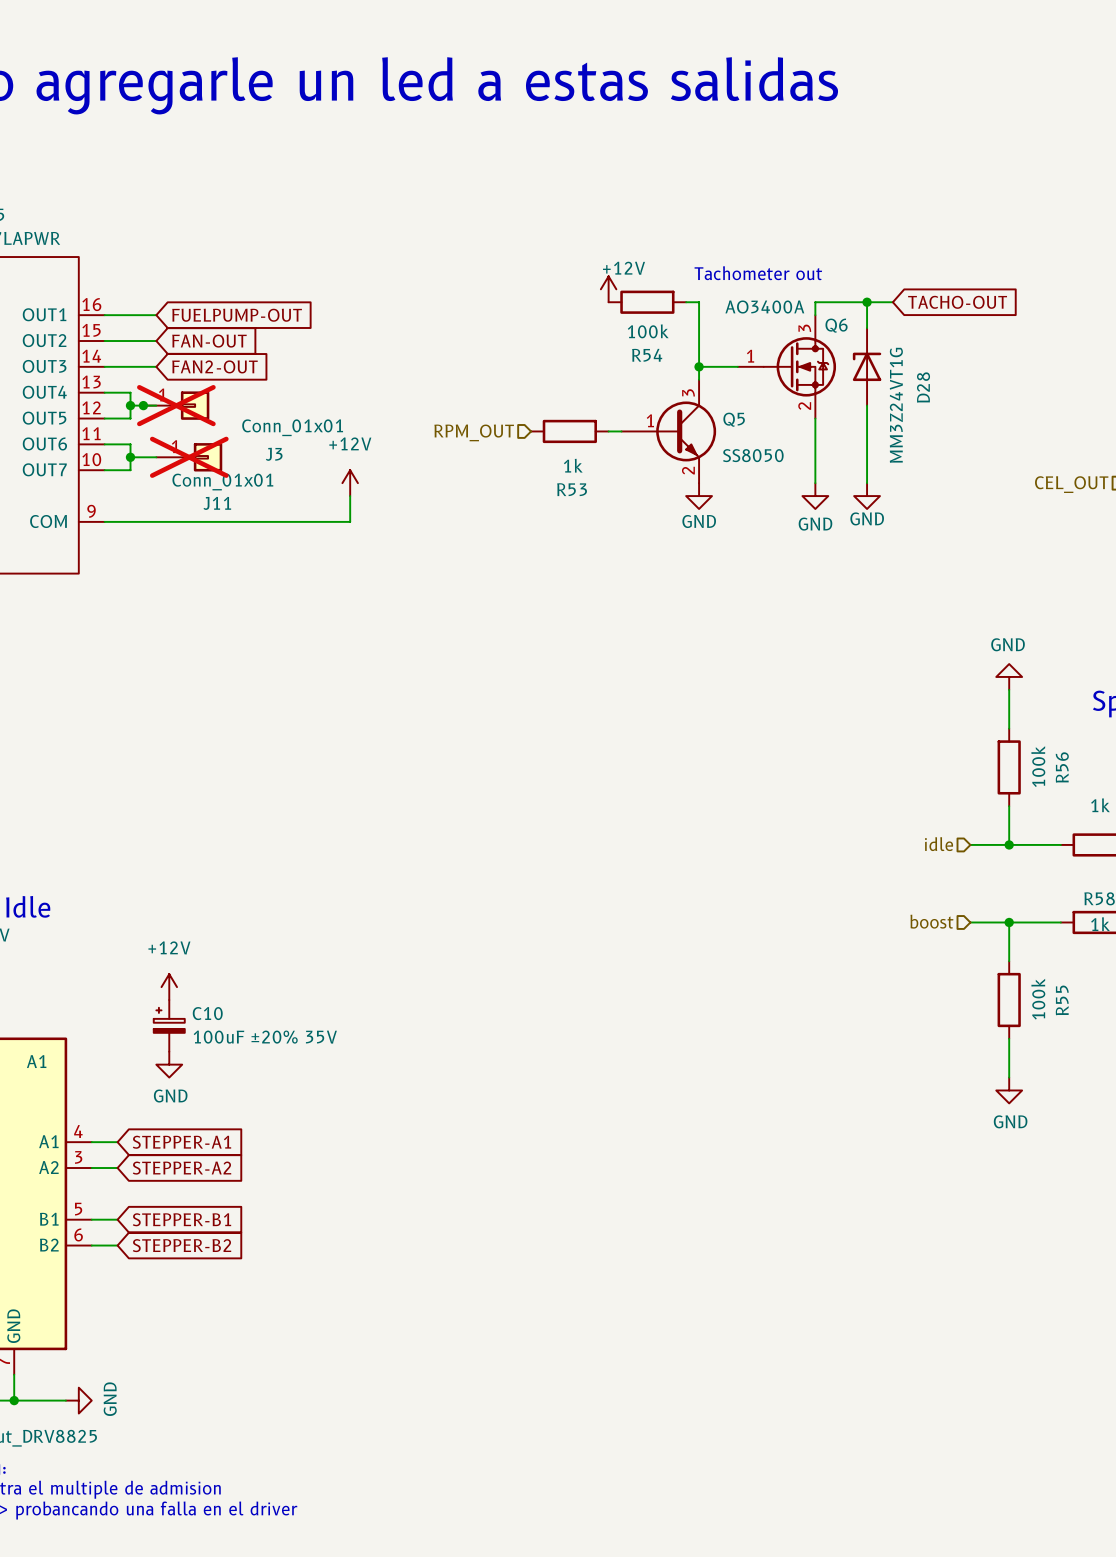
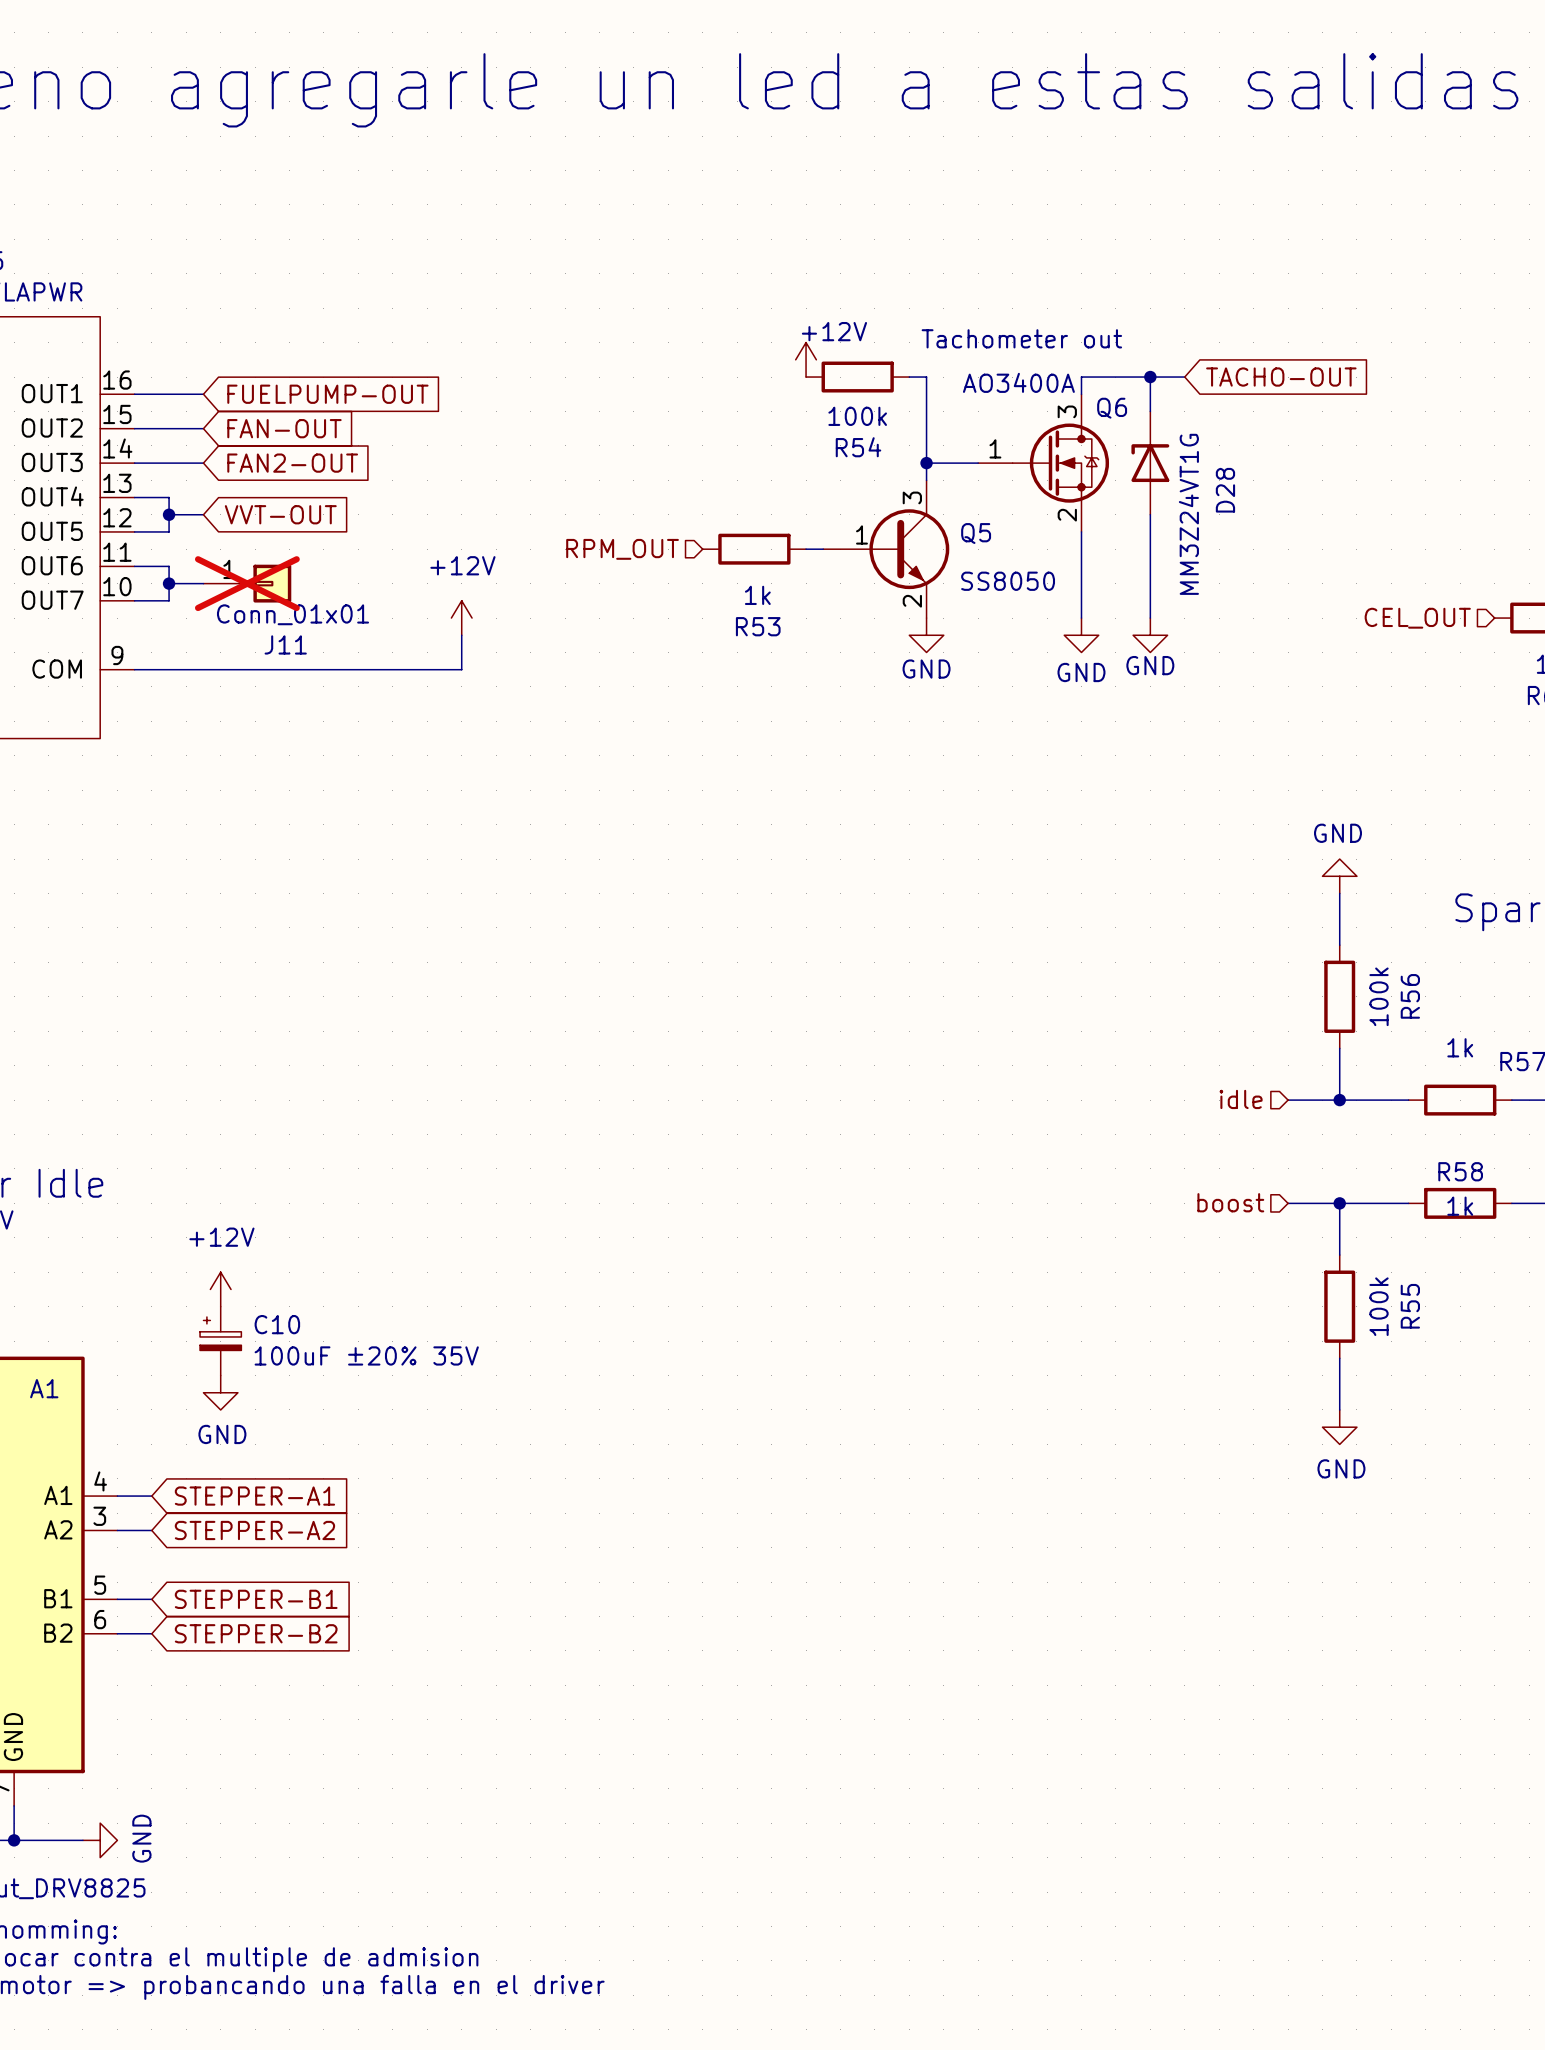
junction: (143, 405) -> none
J3: Conn_01x01 (176, 405) -> none
global label: none -> VVT-OUT (280, 514)

